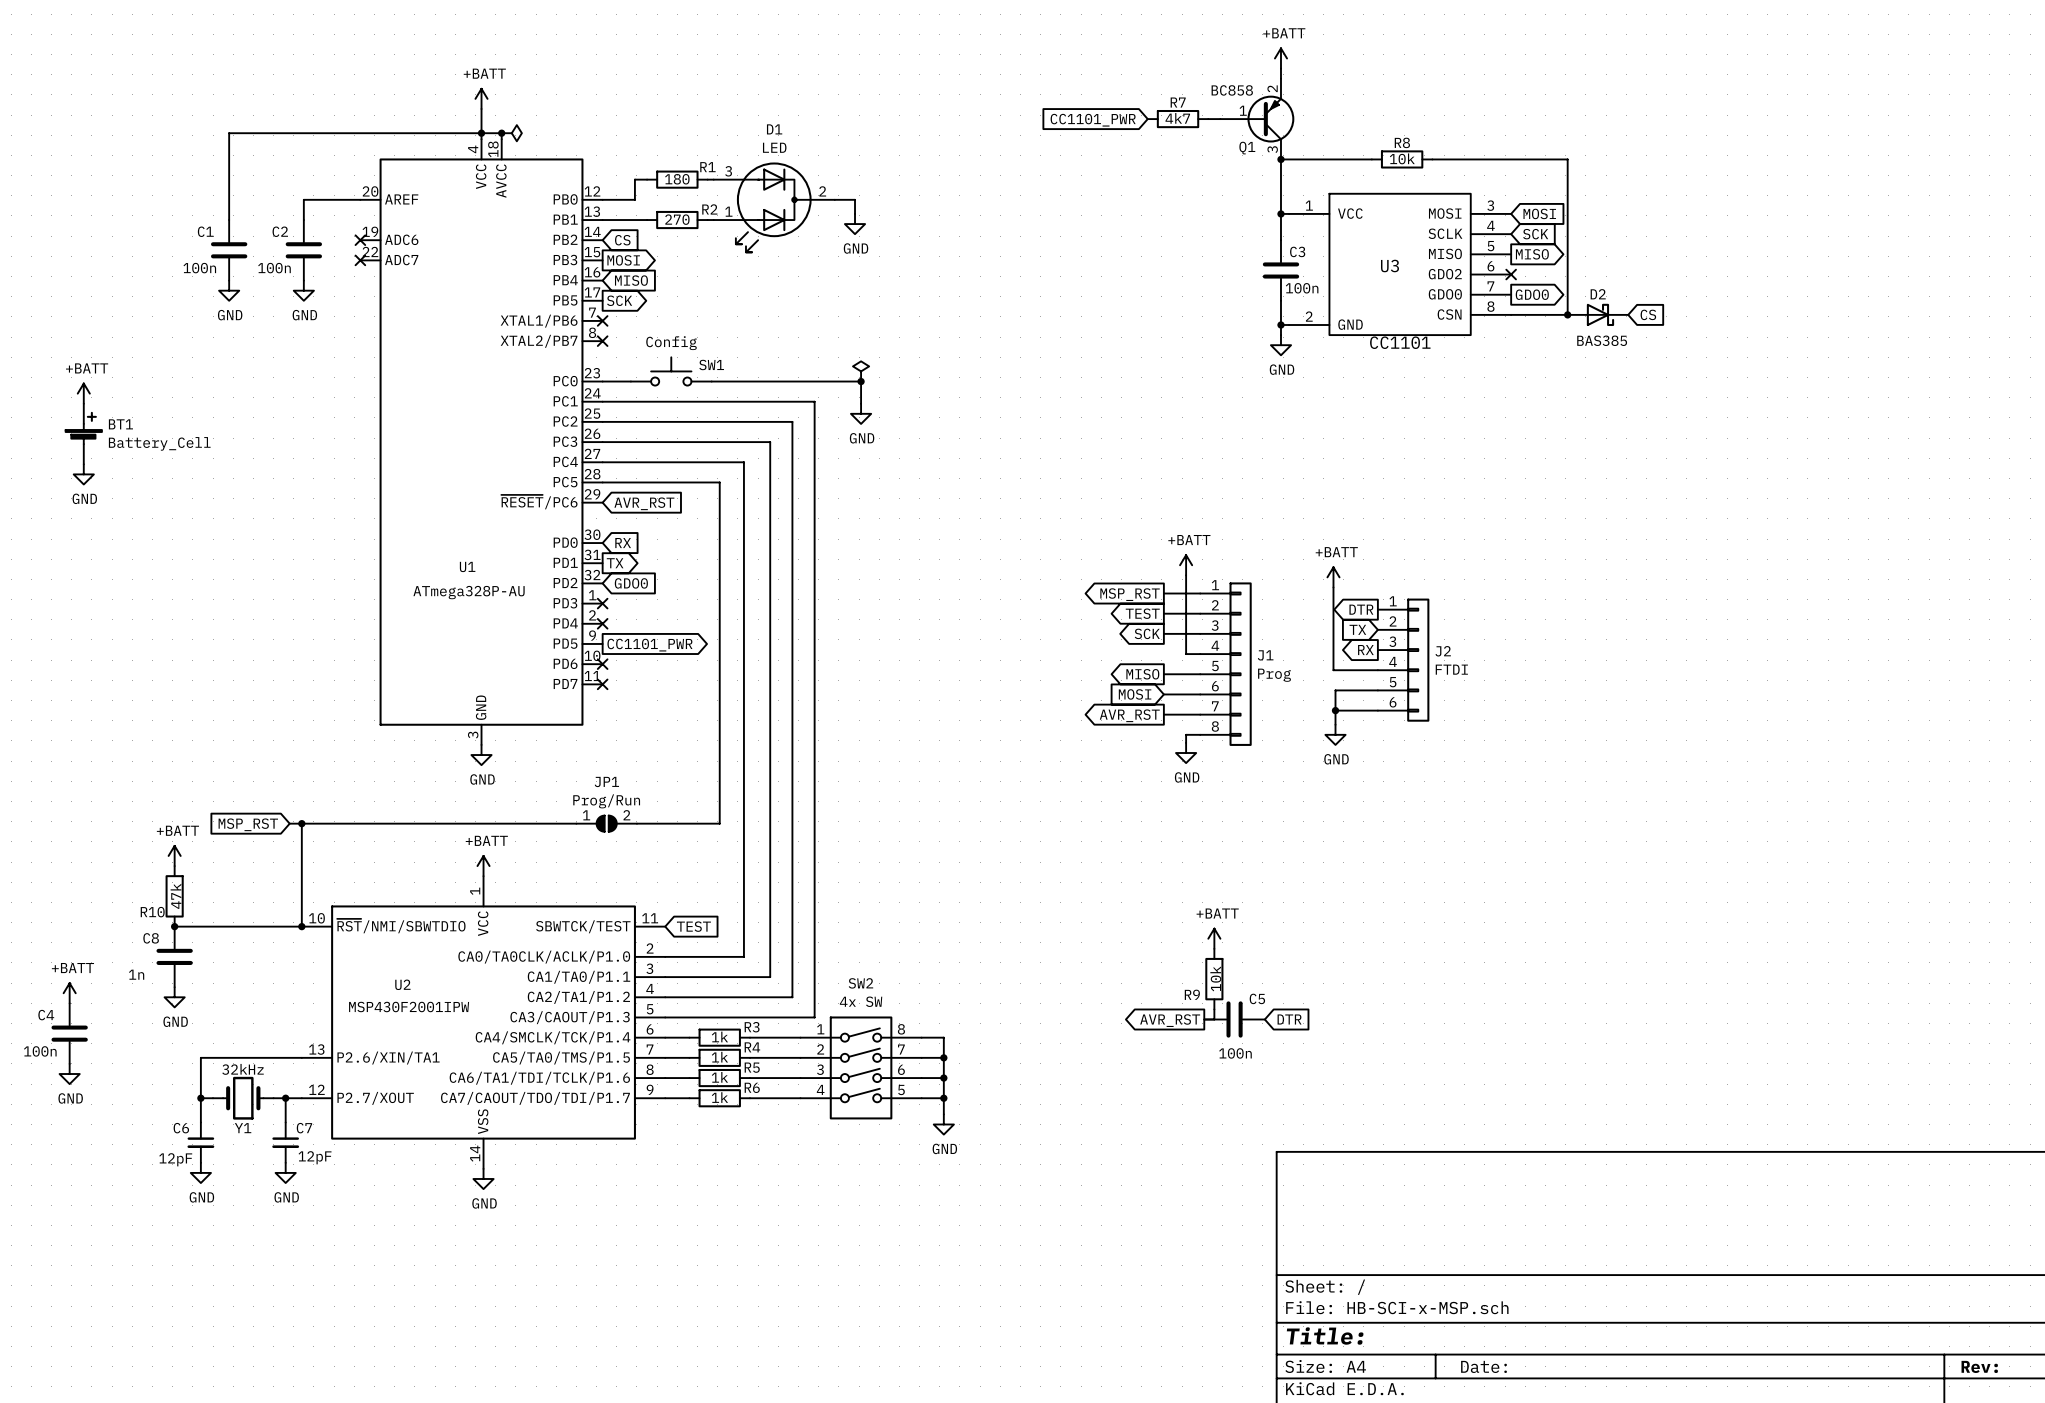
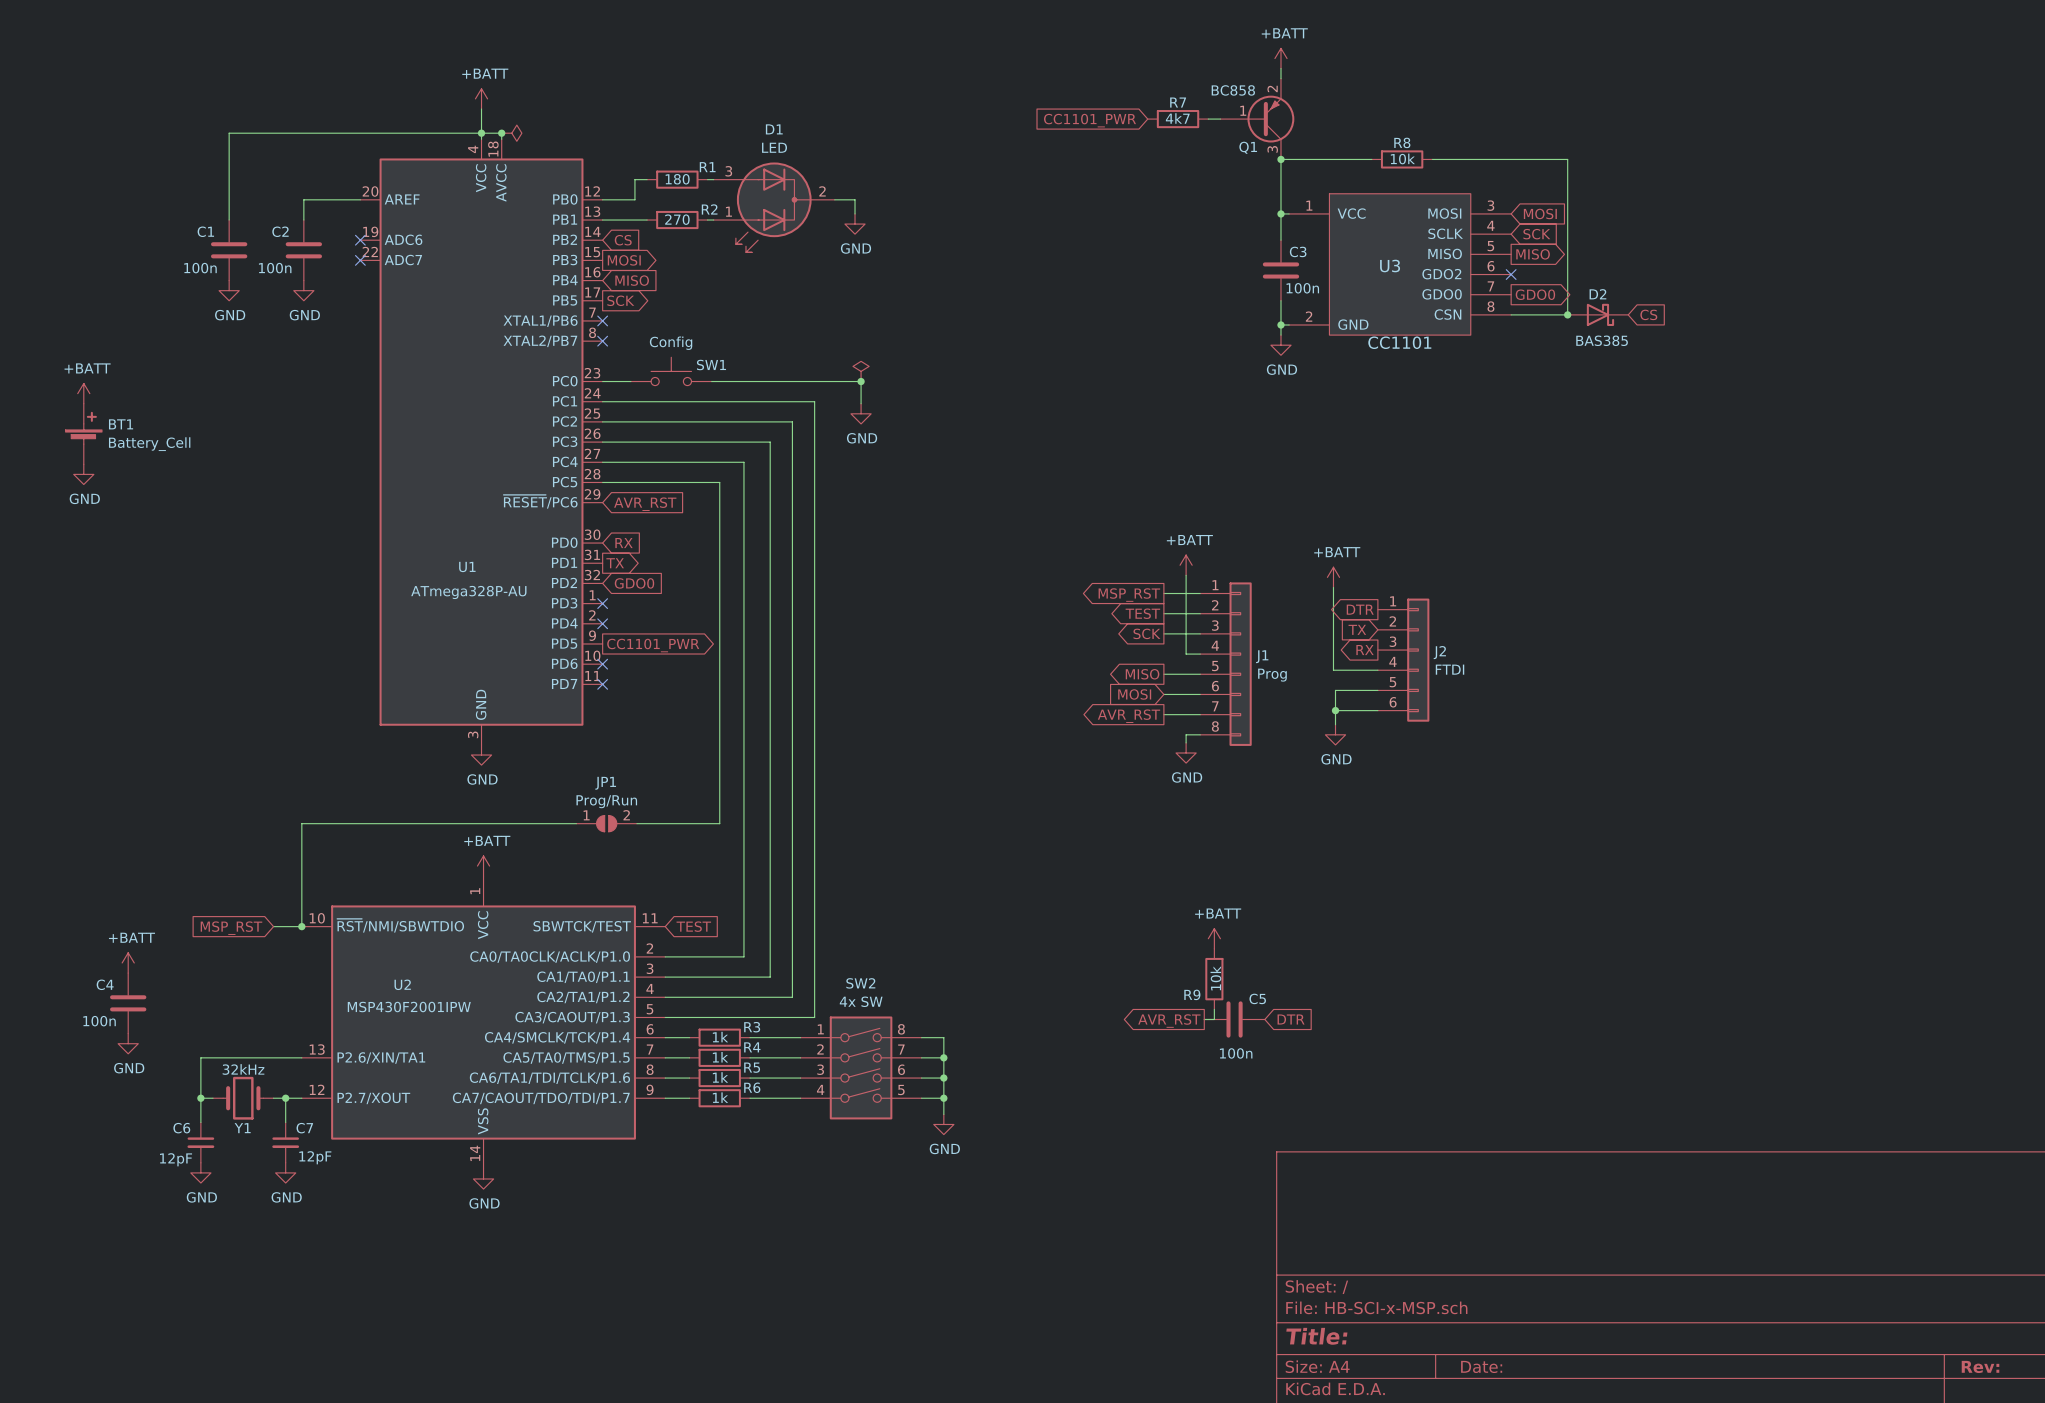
wire: (289, 823) (301, 823) -> none
junction: (301, 823) -> none
global label position: MSP_RST (248, 824) -> MSP_RST (231, 928)
power symbol: +BATT (174, 855) -> none
R10: 47k (174, 896) -> none
wire: (174, 926) (273, 926) -> none
junction: (174, 926) -> none
C8: 1n (174, 956) -> none
power symbol: none -> +BATT (128, 962)
power symbol: +BATT (69, 993) -> none
power symbol: GND (174, 997) -> none
C4 position: (69, 1033) -> (128, 1003)
power symbol: none -> GND (128, 1043)
power symbol: GND (69, 1074) -> none

